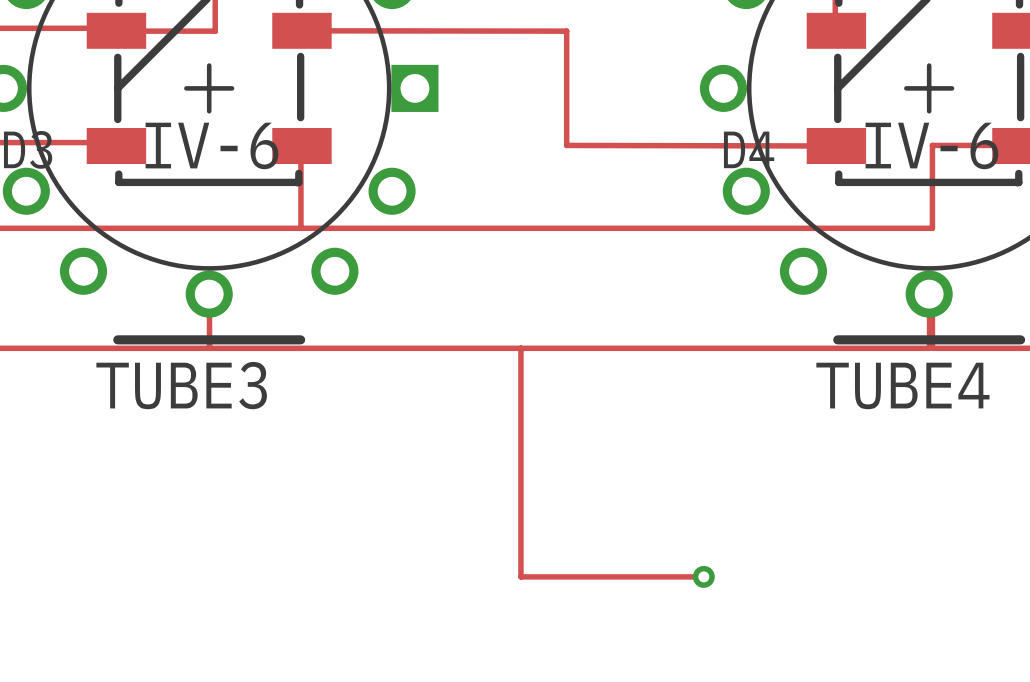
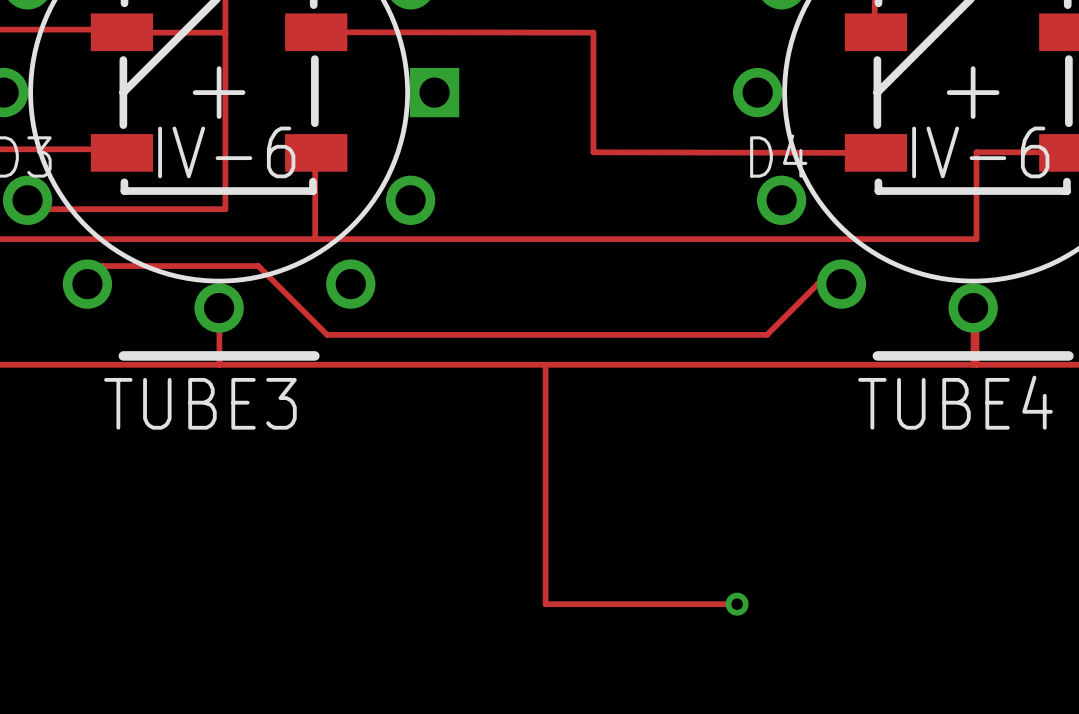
track: none -> (225, 32) (225, 209) (36, 209) (27, 200)
track: none -> (84, 283) (102, 266) (258, 266) (327, 334) (767, 334) (817, 283) (841, 283)

